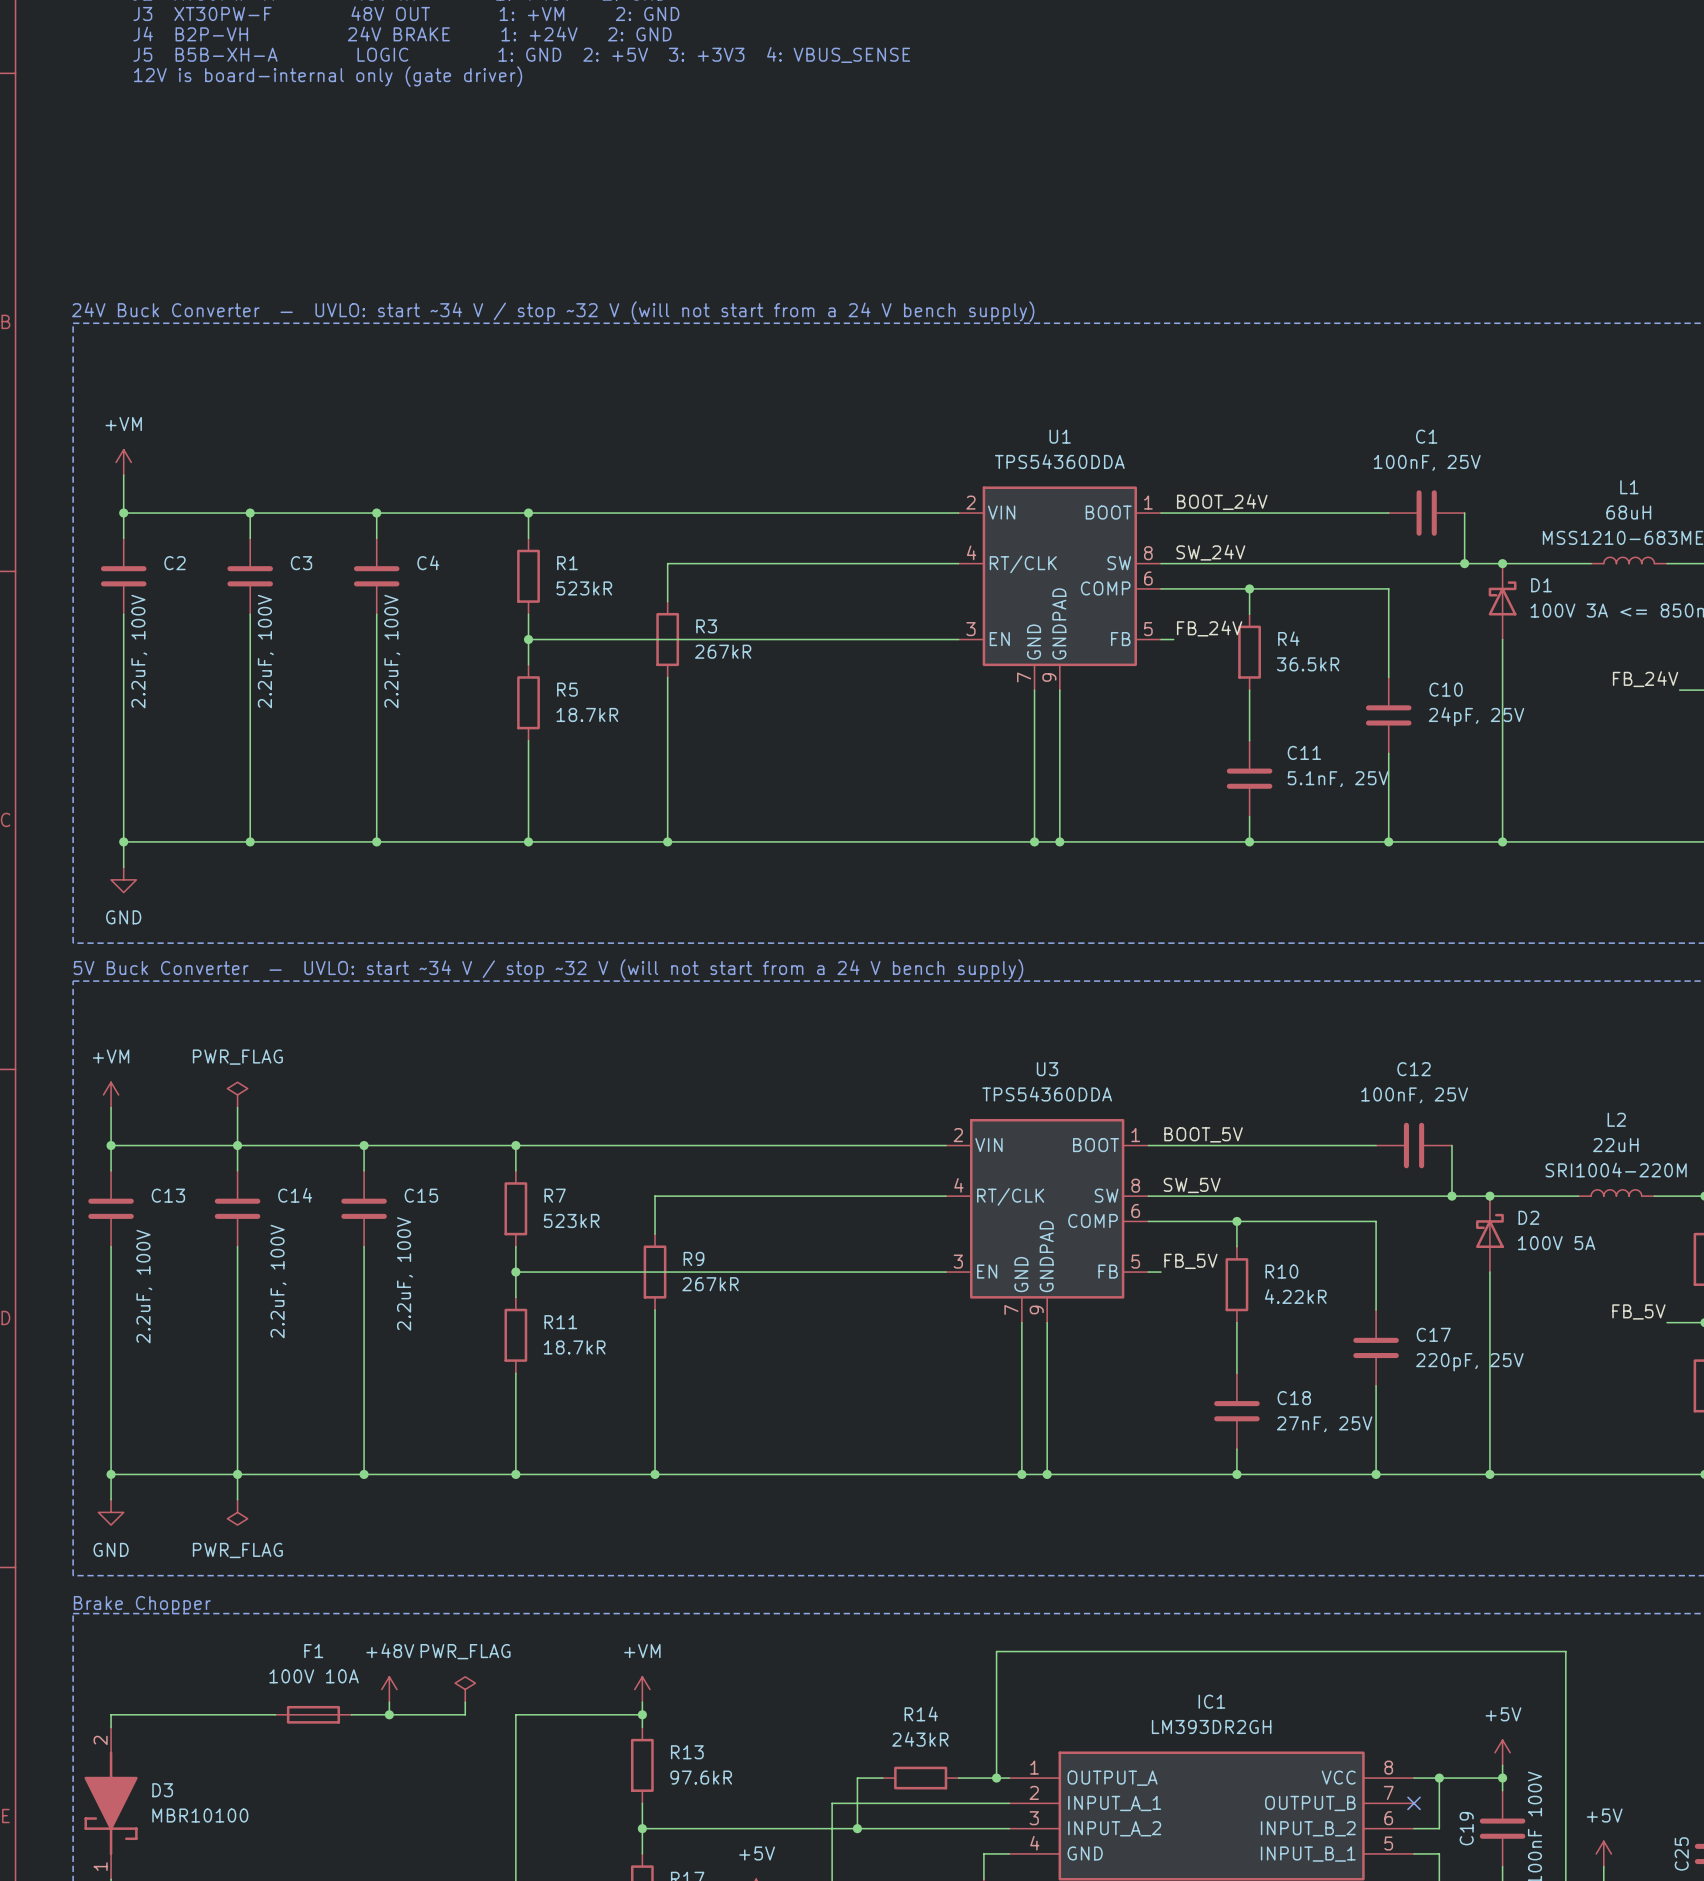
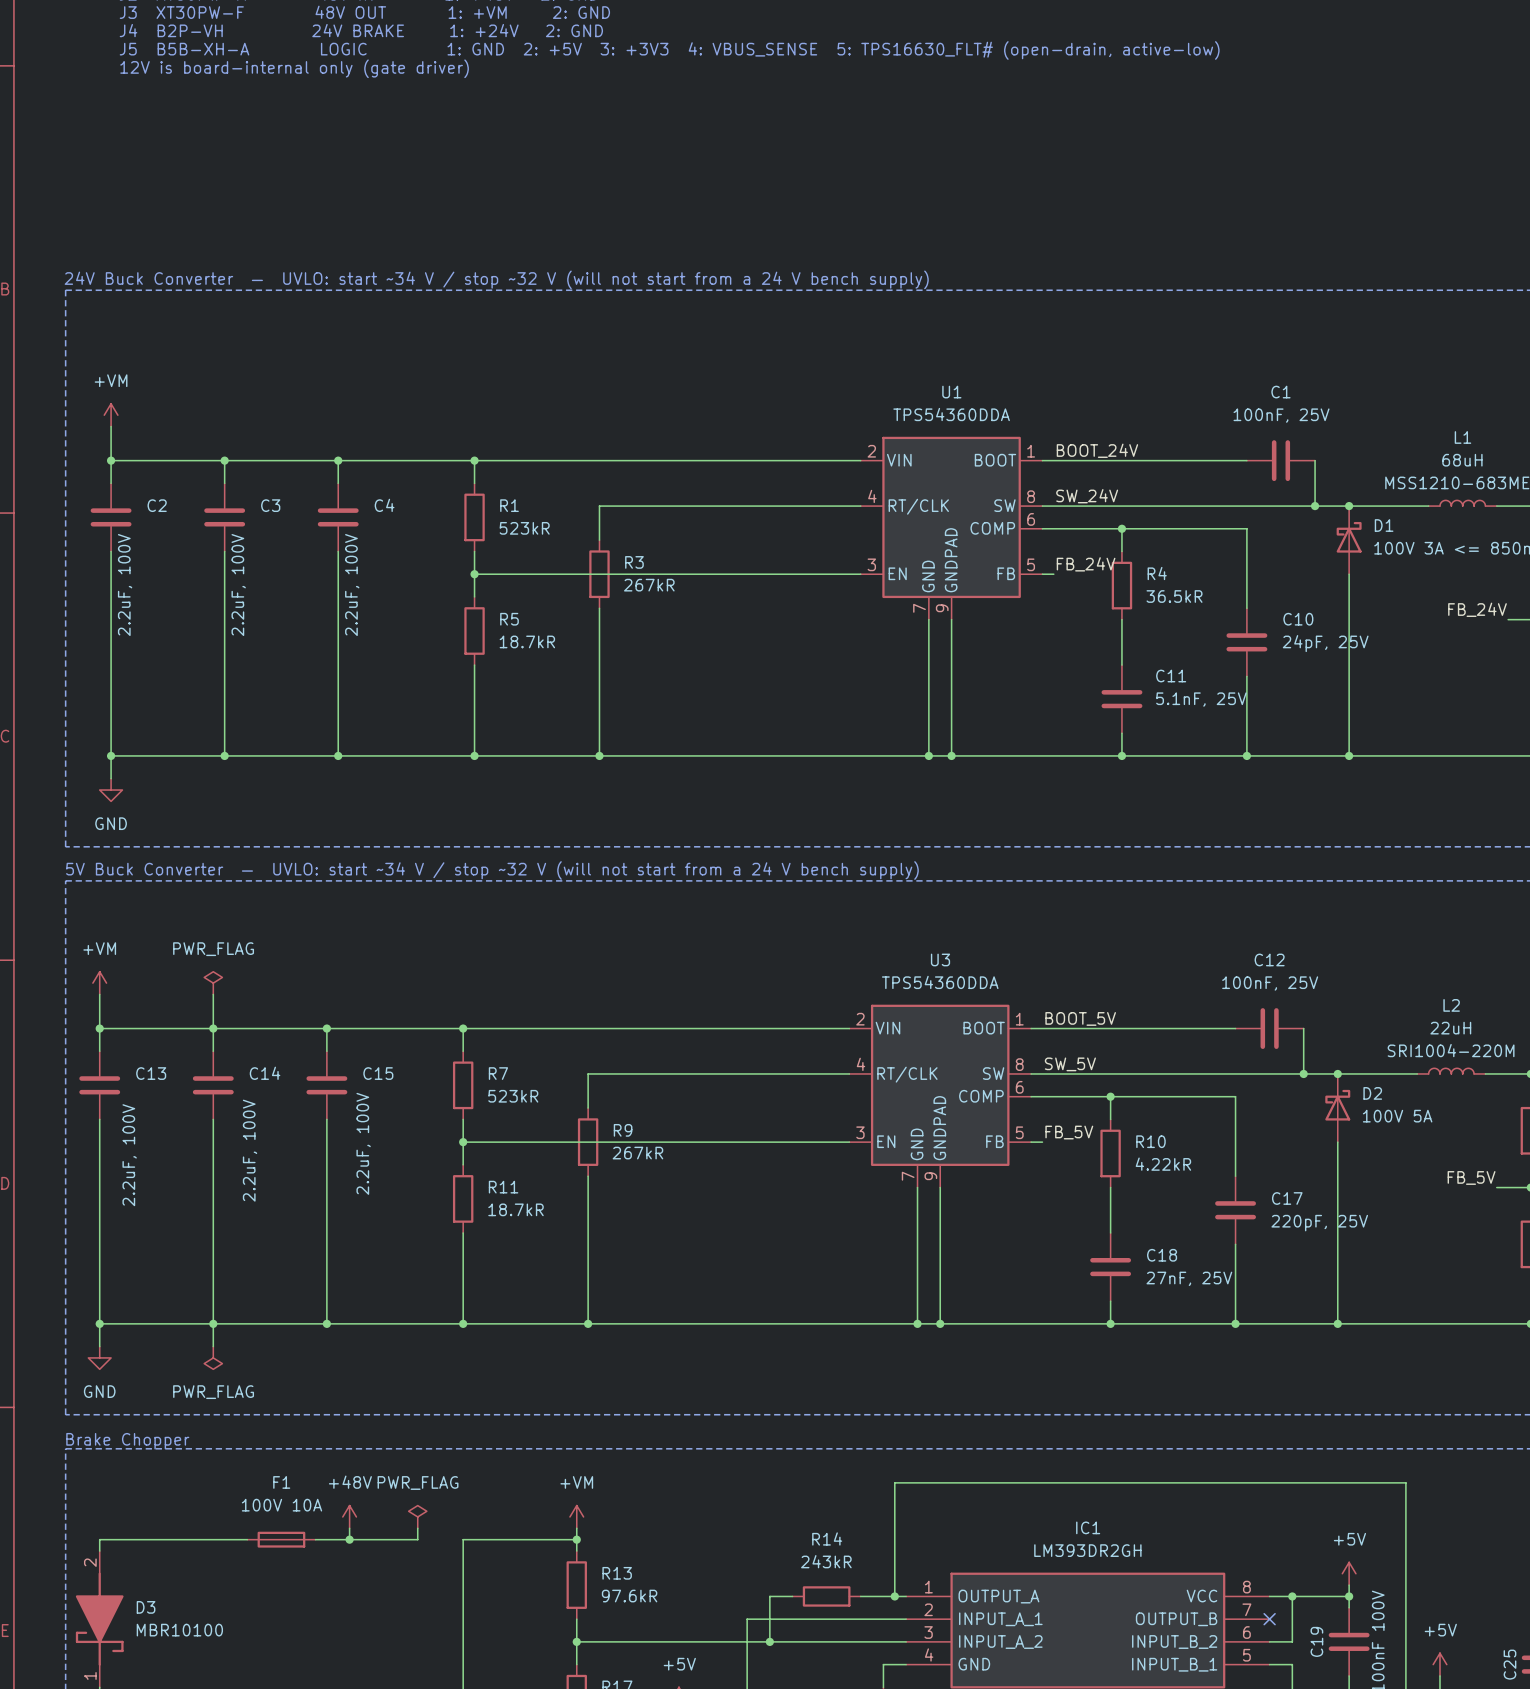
text: J5 B5B-XH-A LOGIC 1: GND 2: +5V 3: +3V3 4: VBUS_SENSE (521, 55) -> J5 B5B-XH-A LOGIC 1: GND 2: +5V 3: +3V3 4: VBUS_SENSE 5: TPS16630_FLT# (open-drain, active-low) (669, 50)

